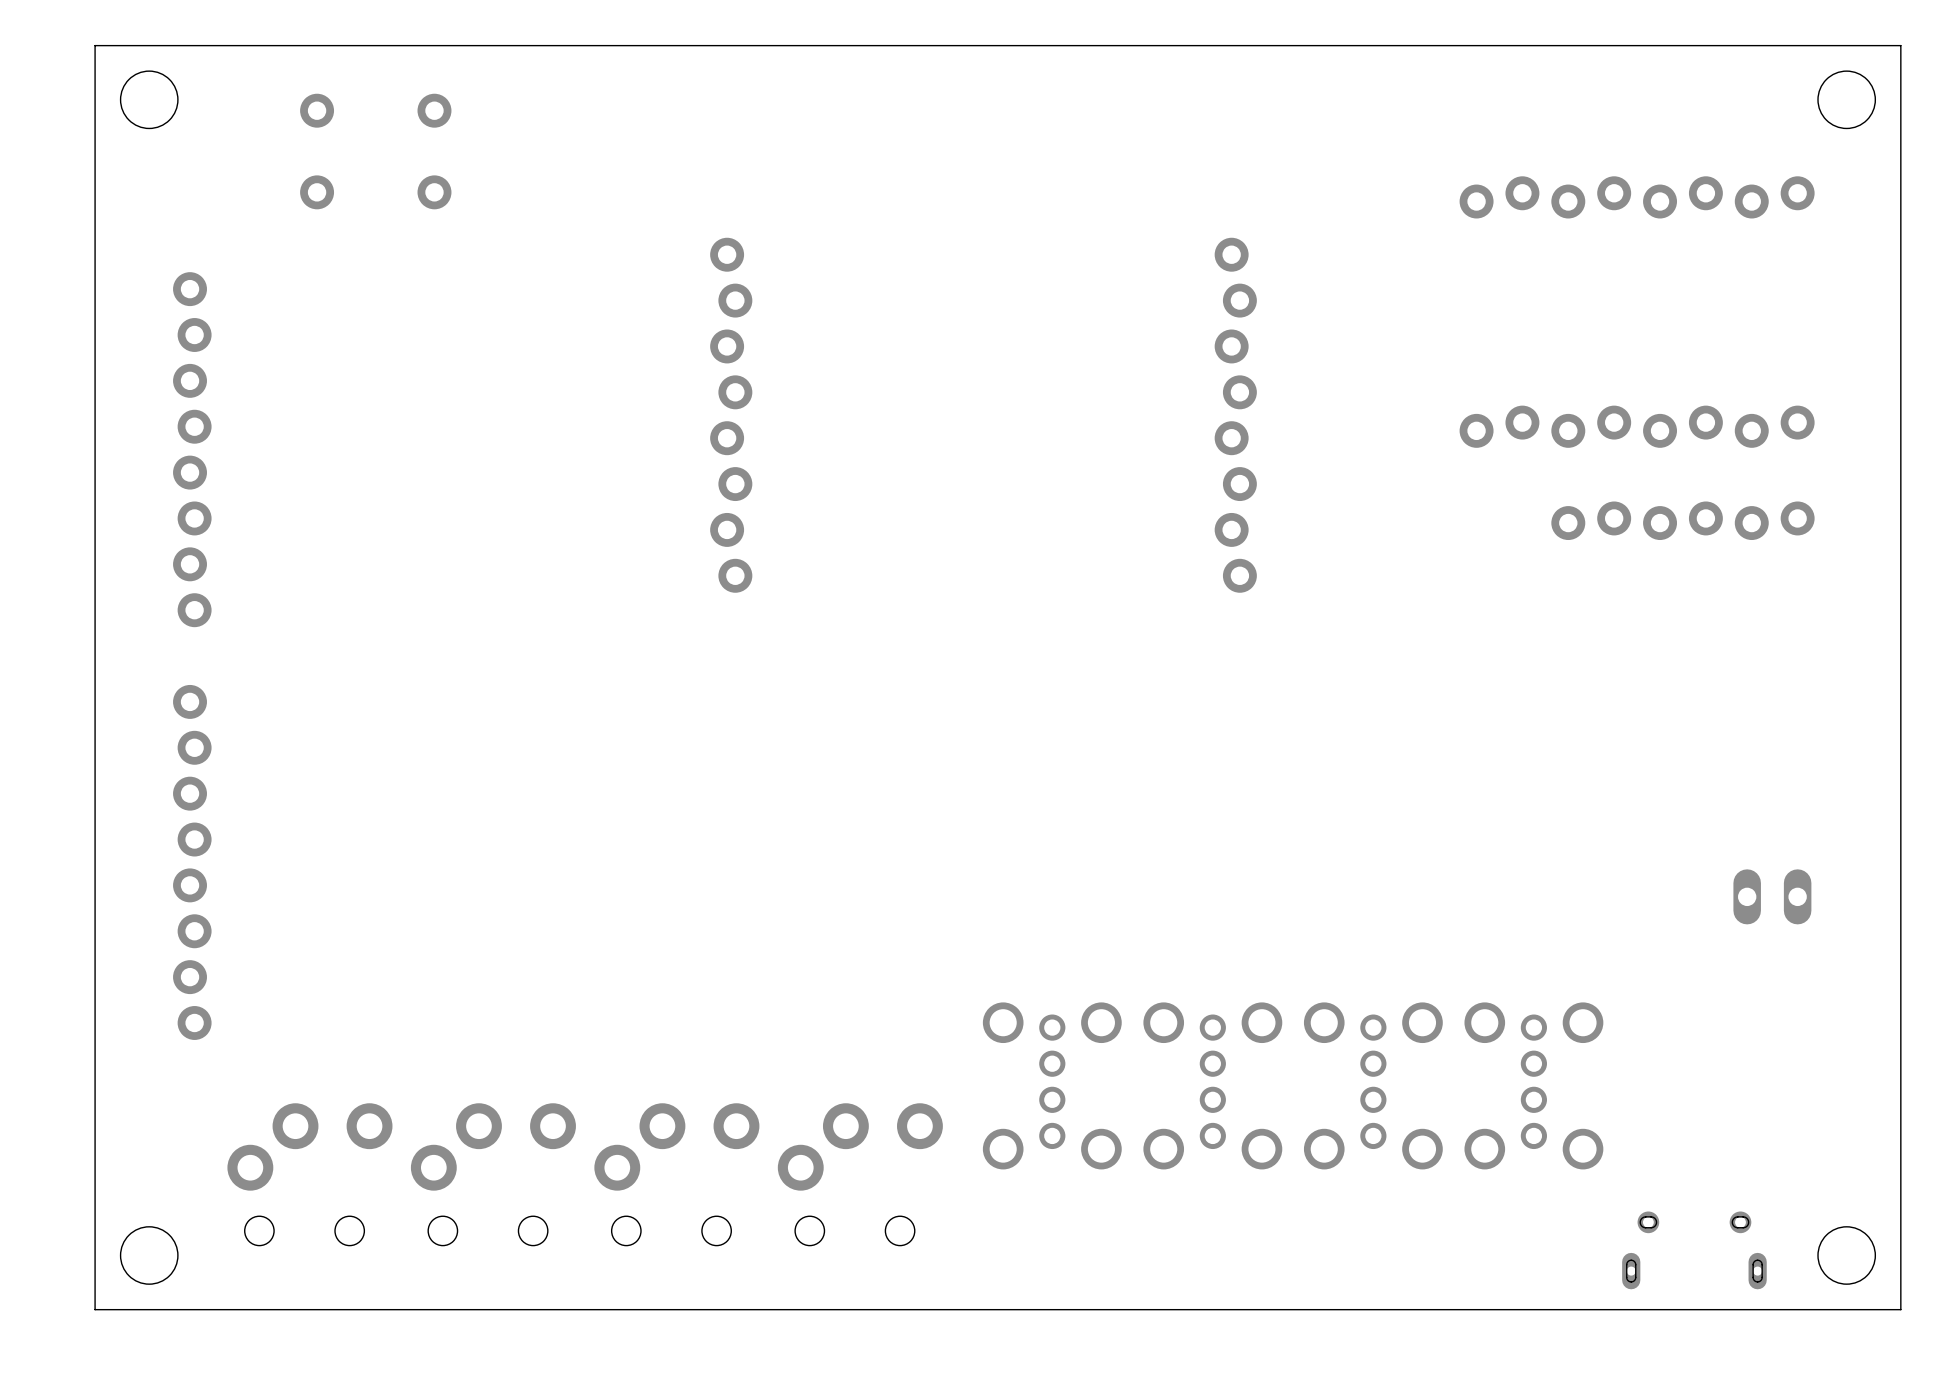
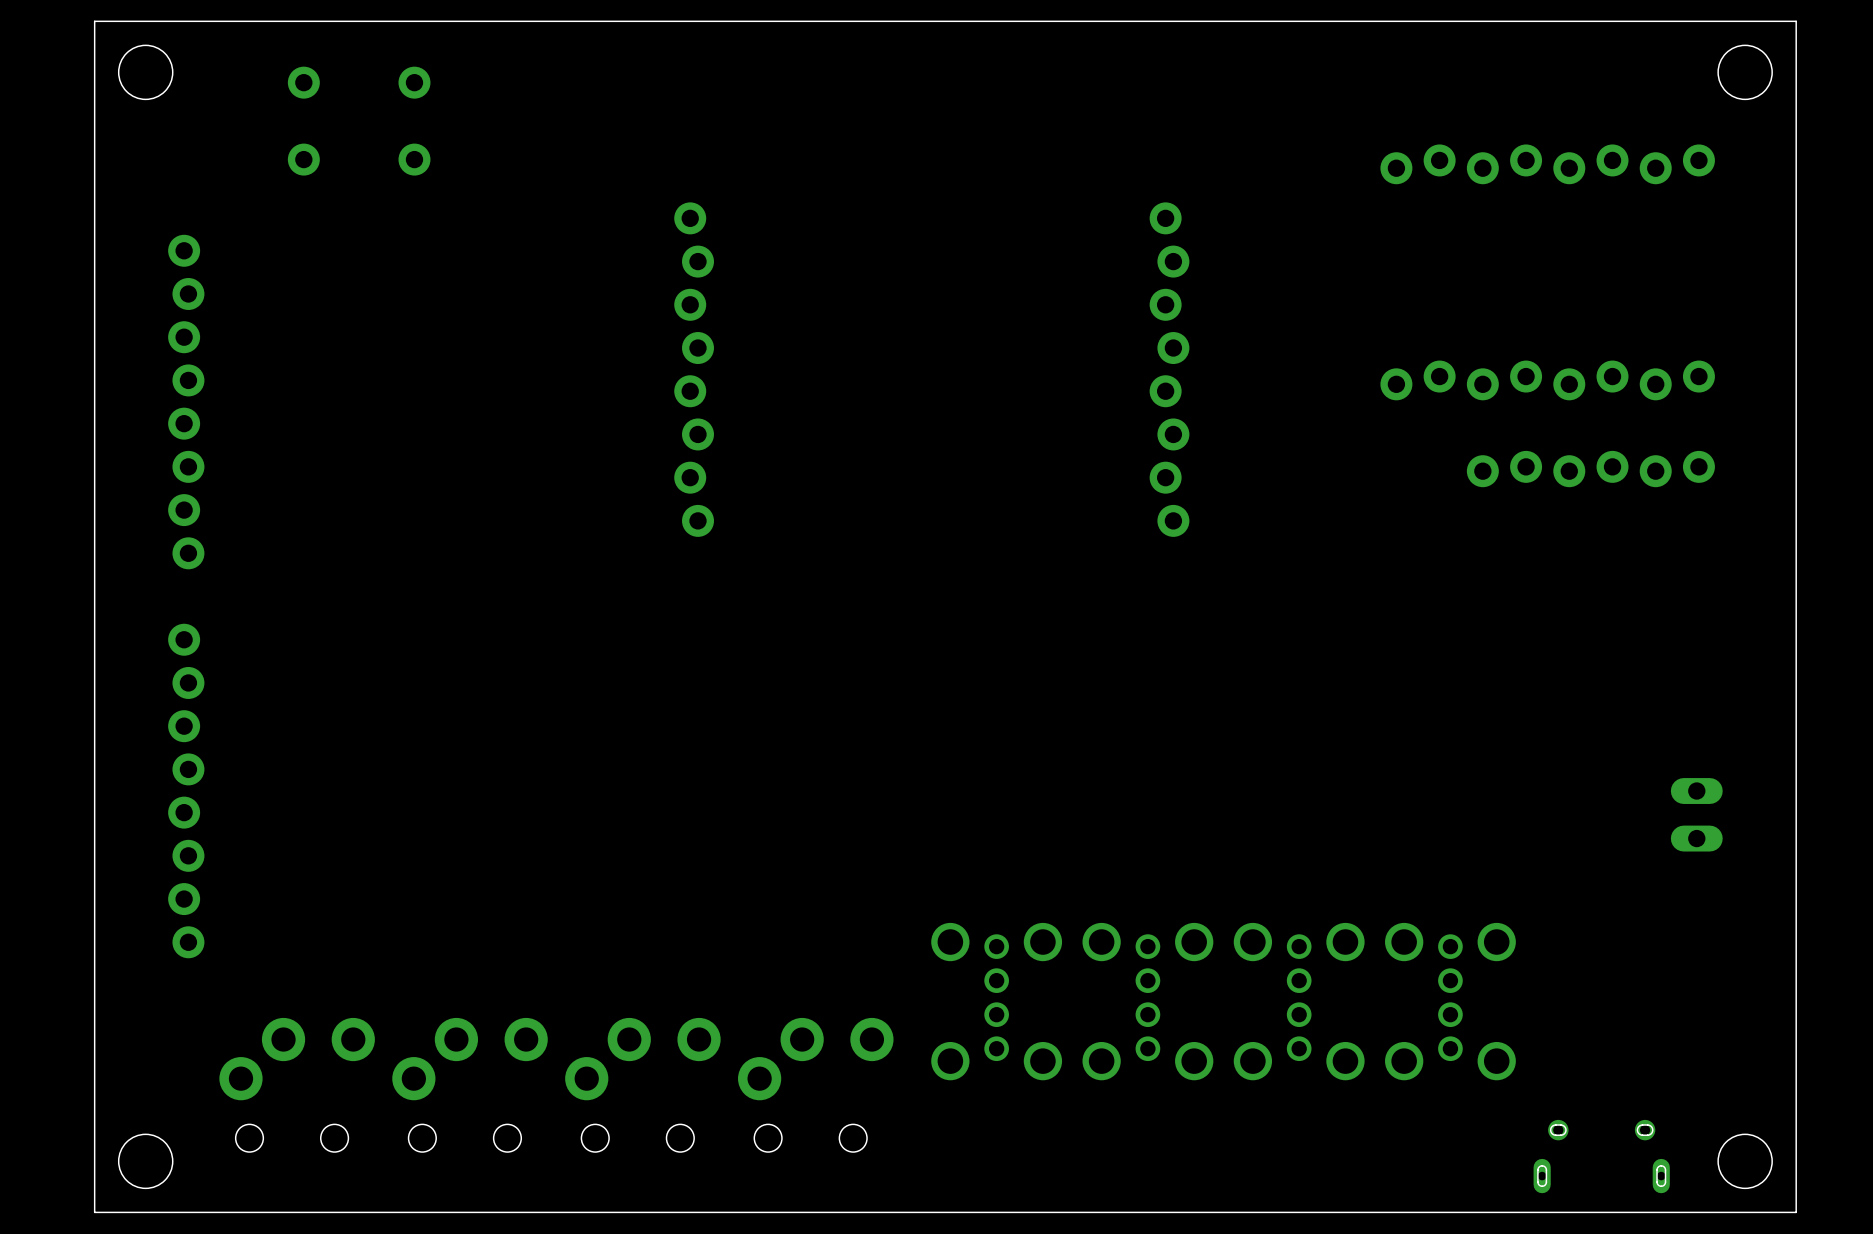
part rotation: 0° (1772, 896) -> 90° clockwise (1696, 814)

